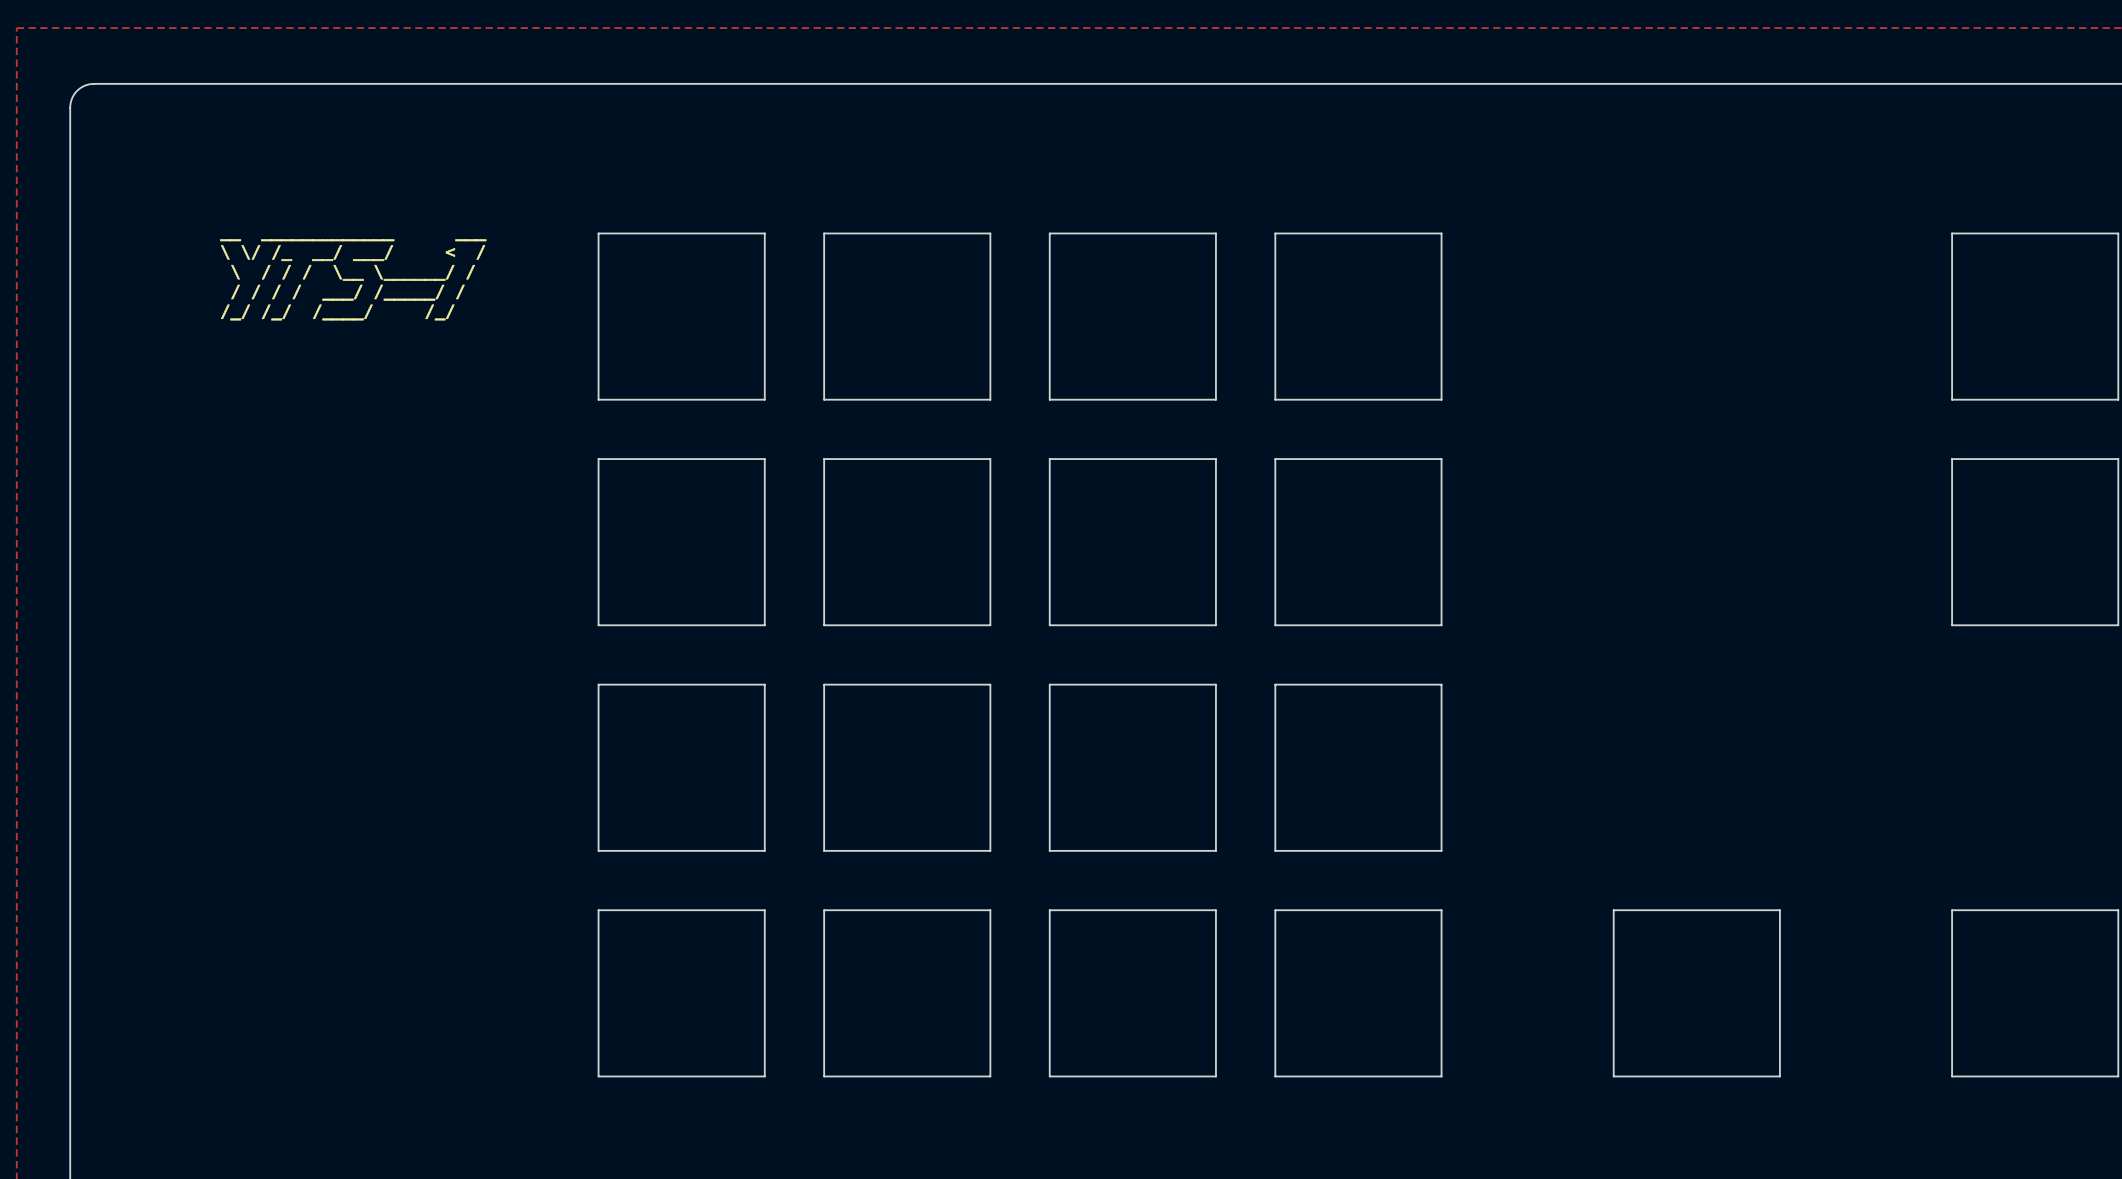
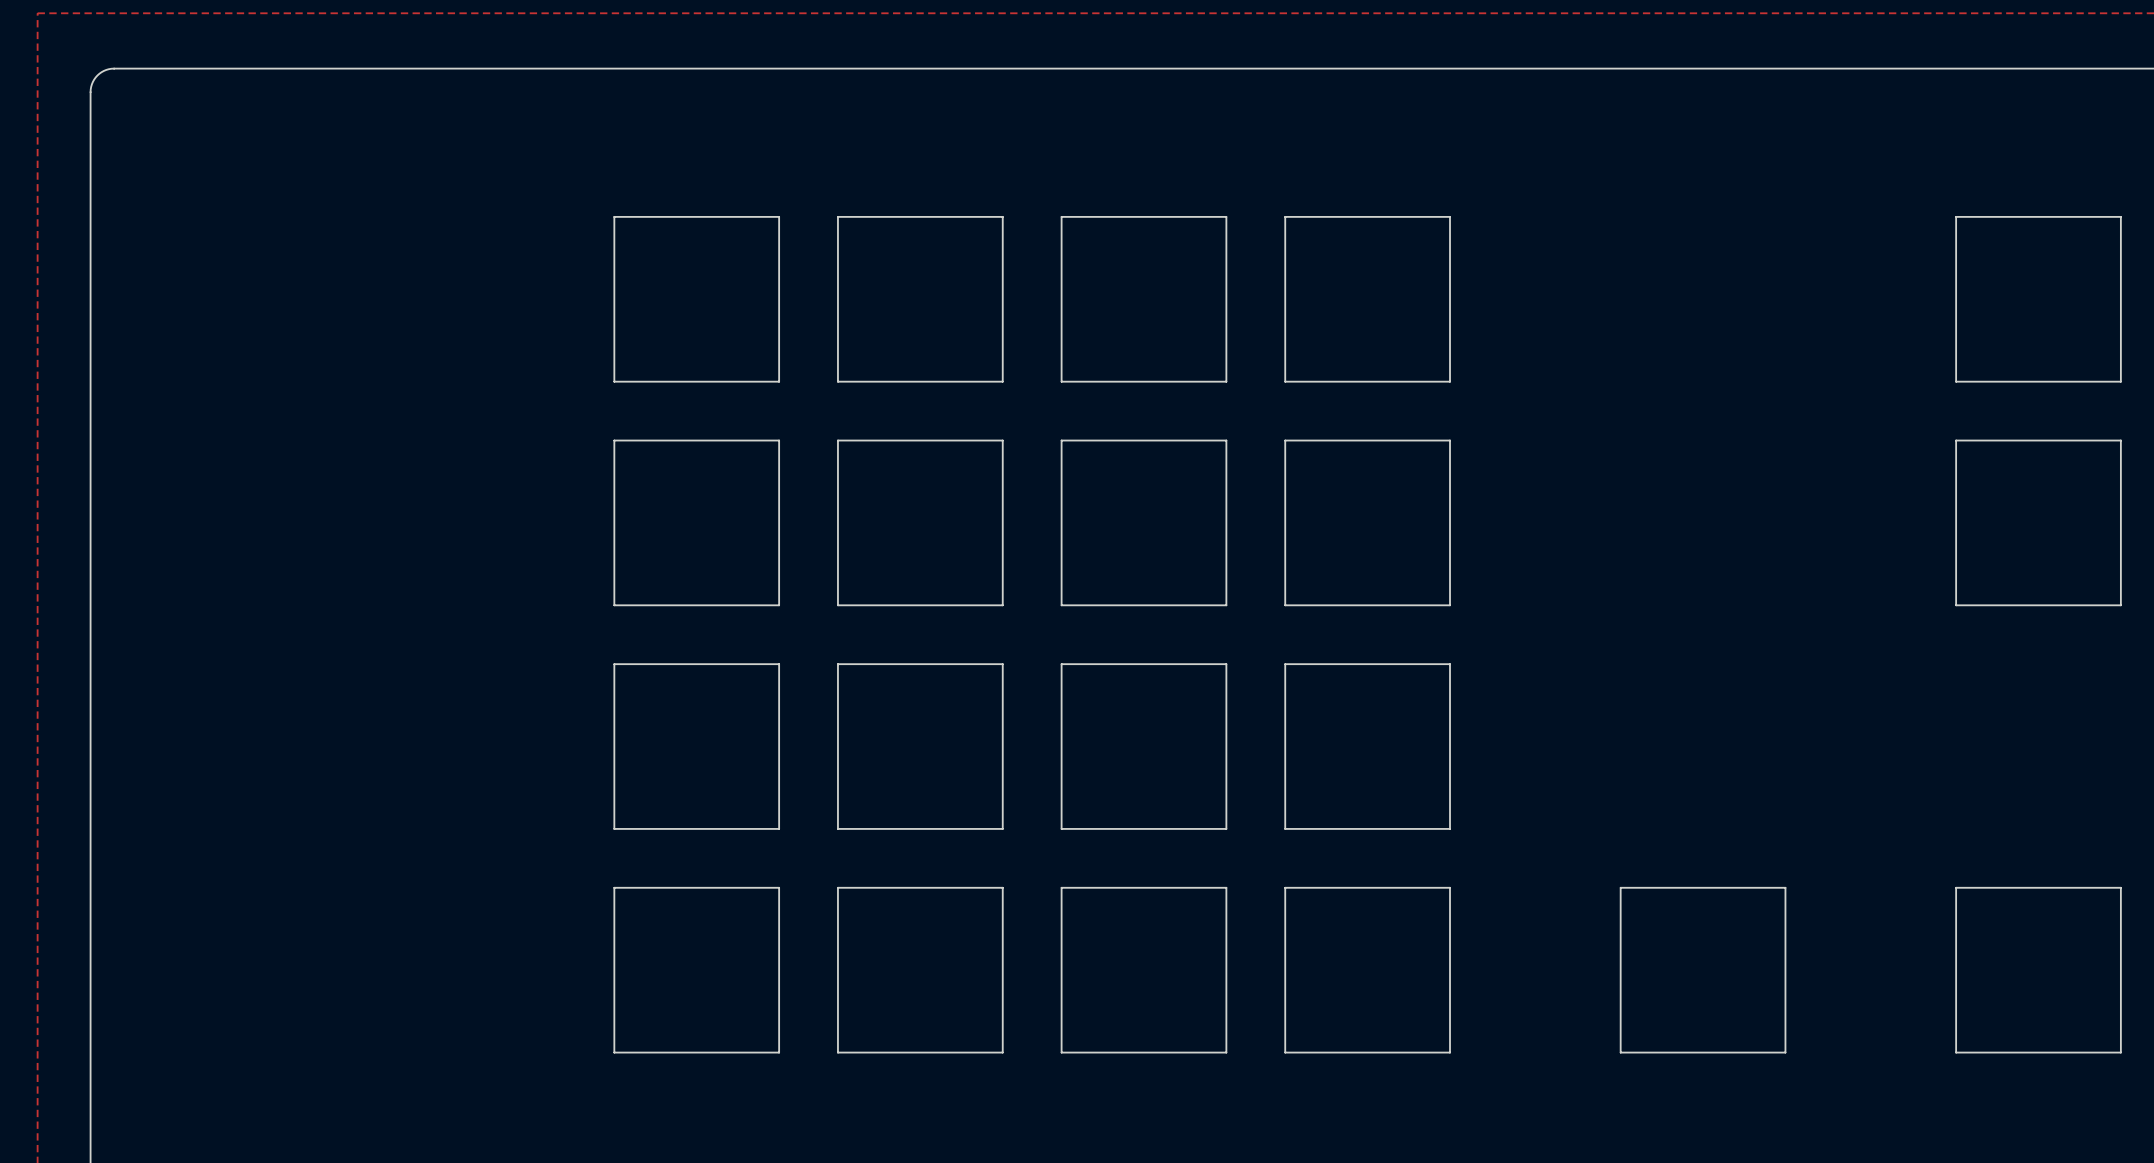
drawing: [220, 239, 487, 321] -> none

